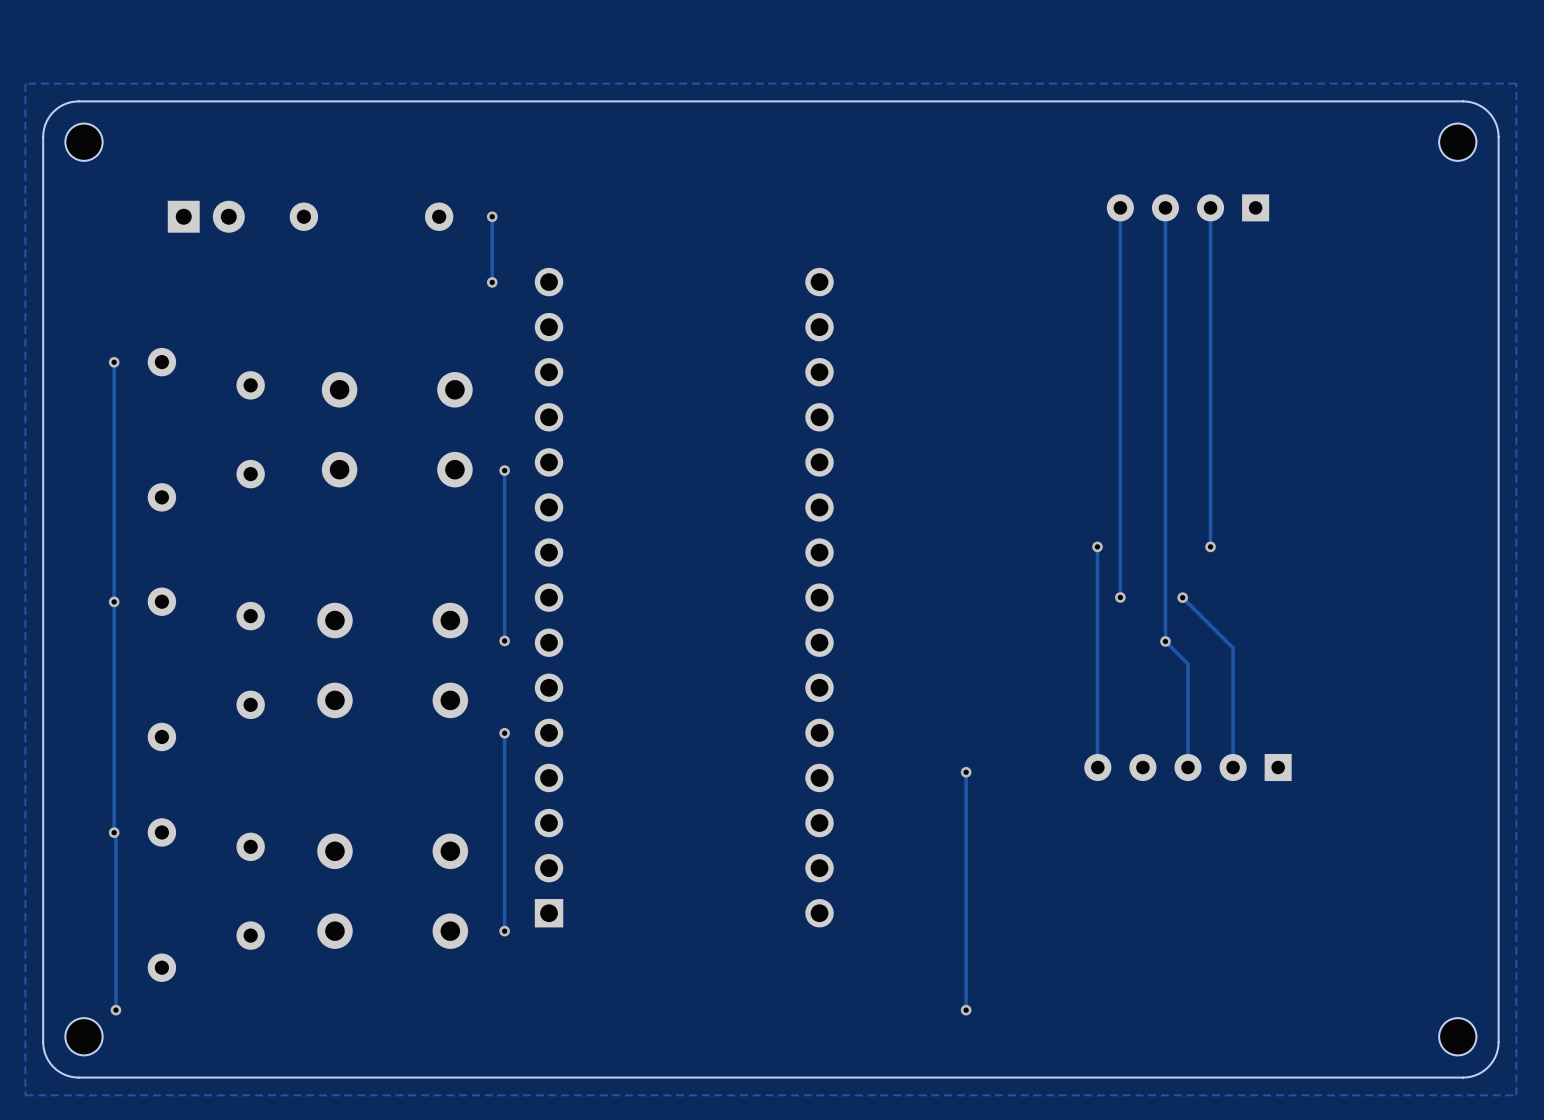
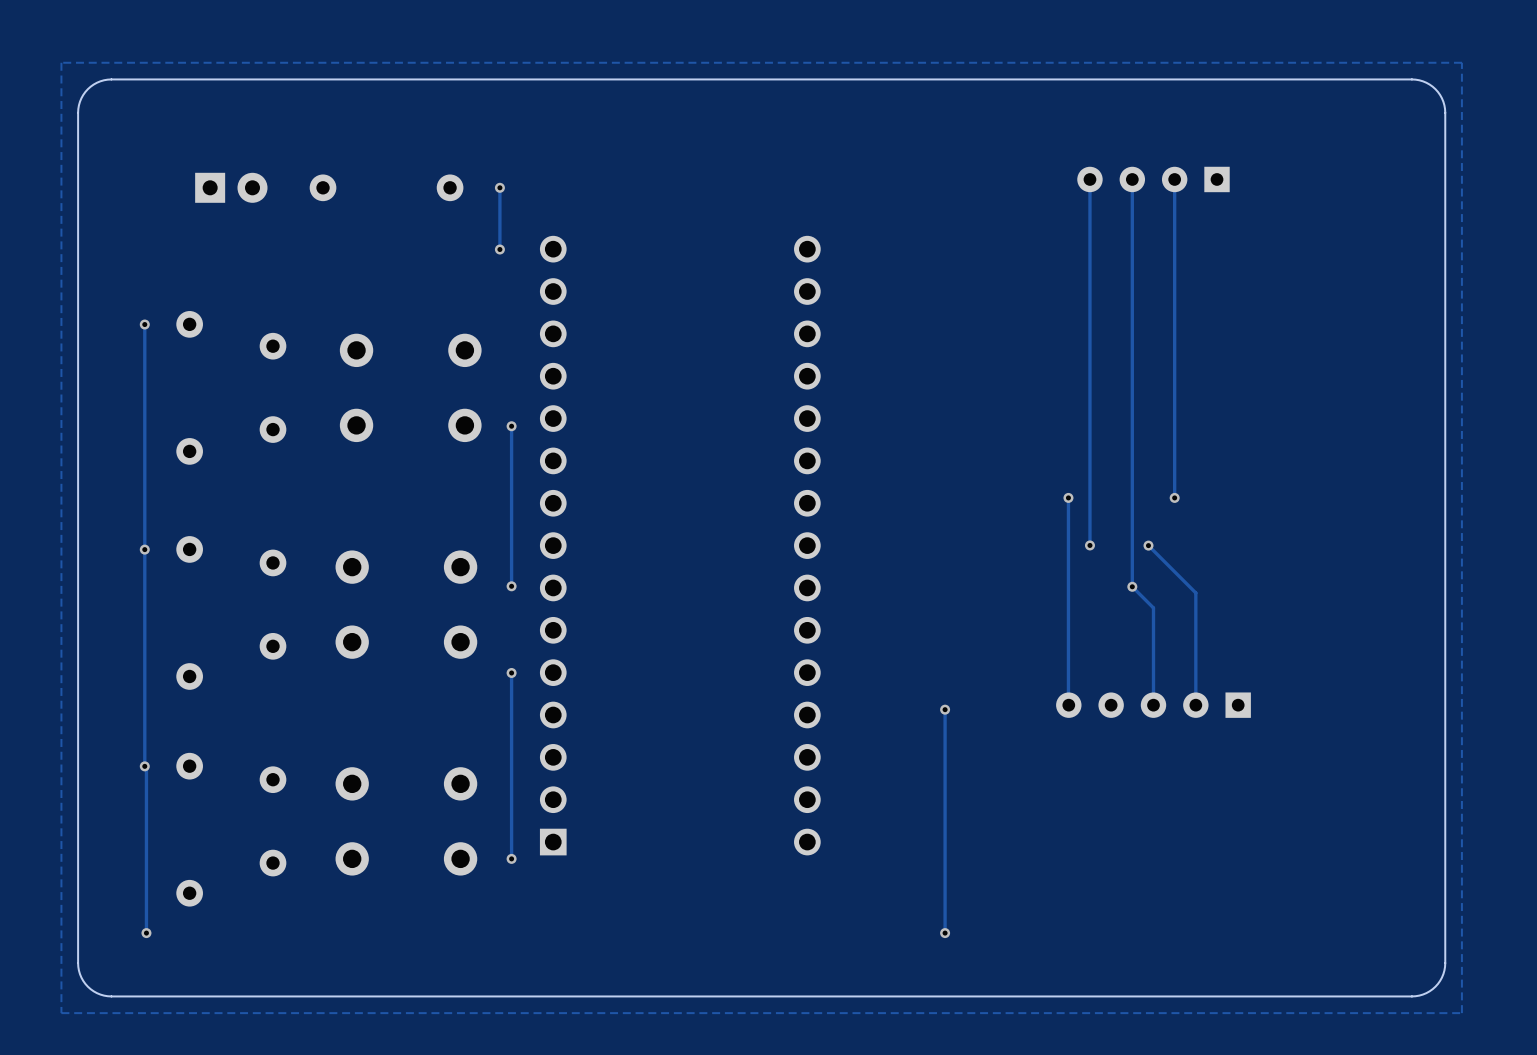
part: (83, 142) -> none
part: (1457, 142) -> none
part: (83, 1036) -> none
part: (1457, 1036) -> none

